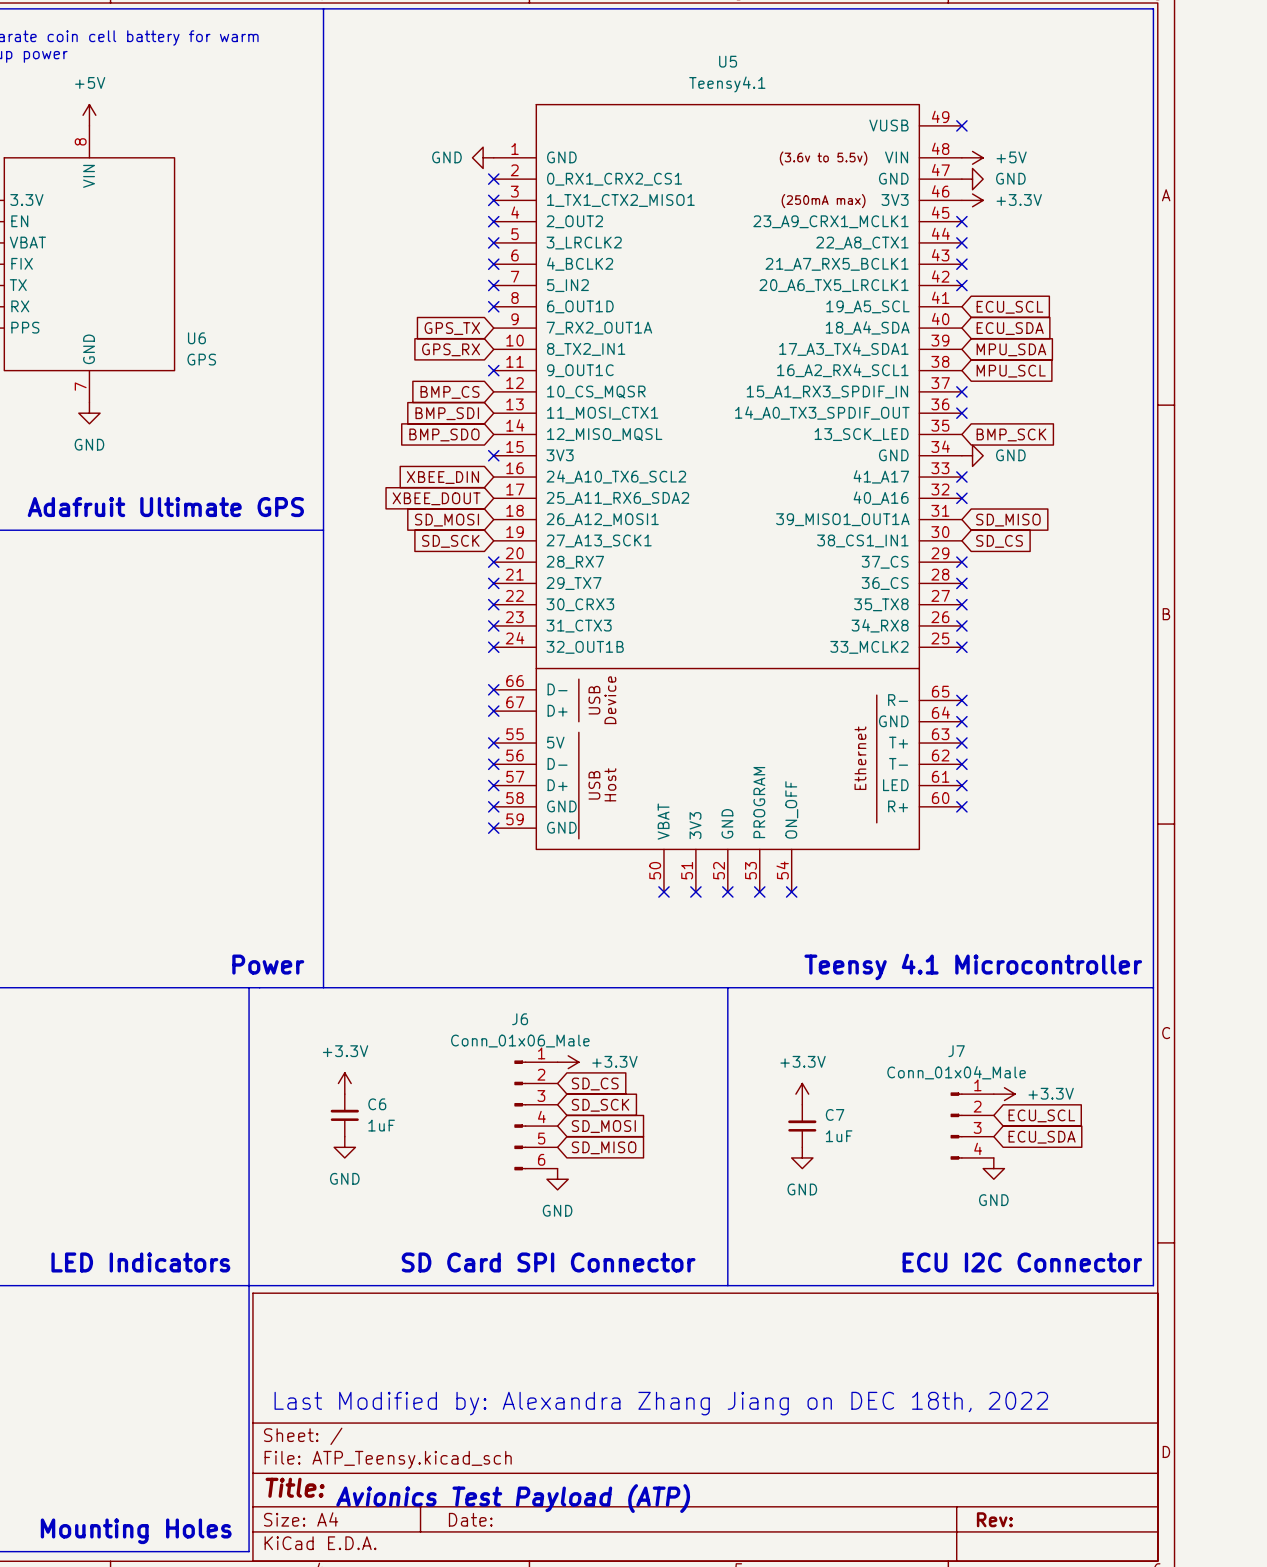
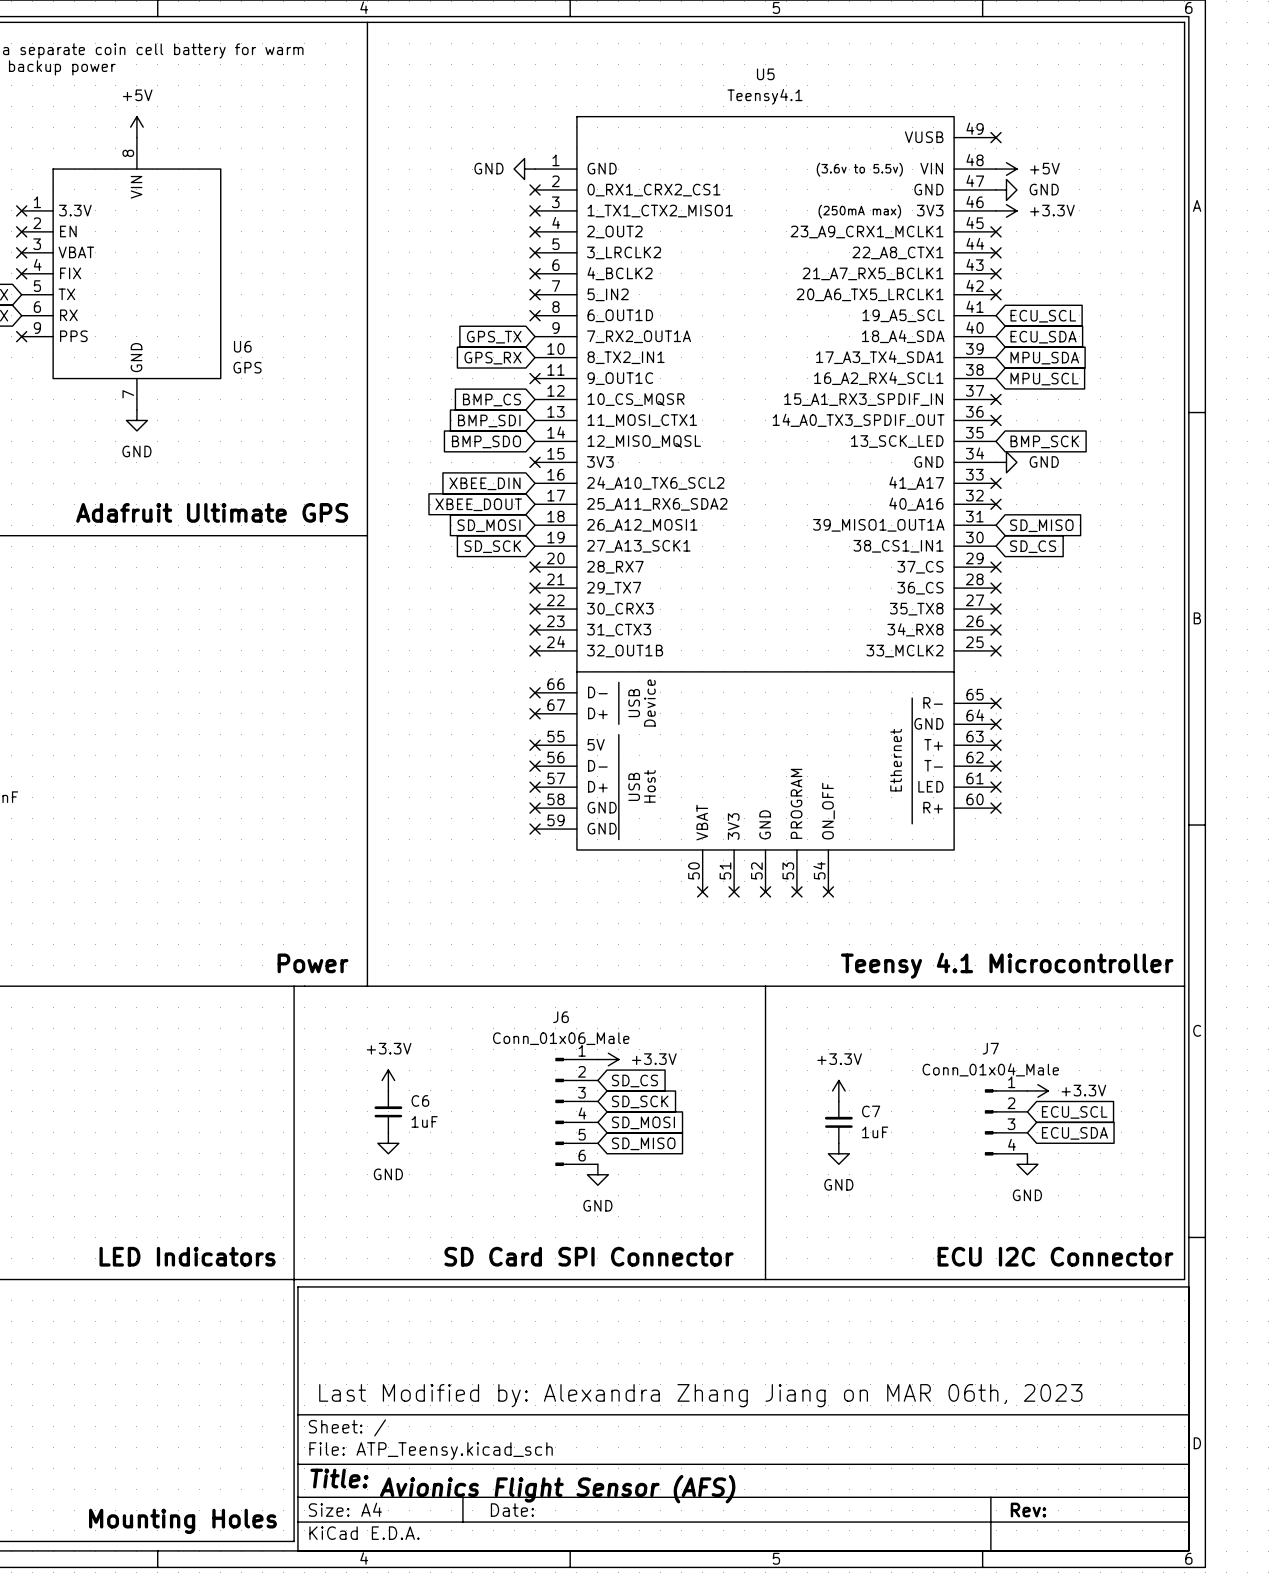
text: Last Modified by: Alexandra Zhang Jiang on DEC 18th, 2022 (661, 1403) -> Last Modified by: Alexandra Zhang Jiang on MAR 06th, 2023 (700, 1395)
text: Avionics Test Payload (ATP) (513, 1498) -> Avionics Flight Sensor (AFS) (557, 1489)

